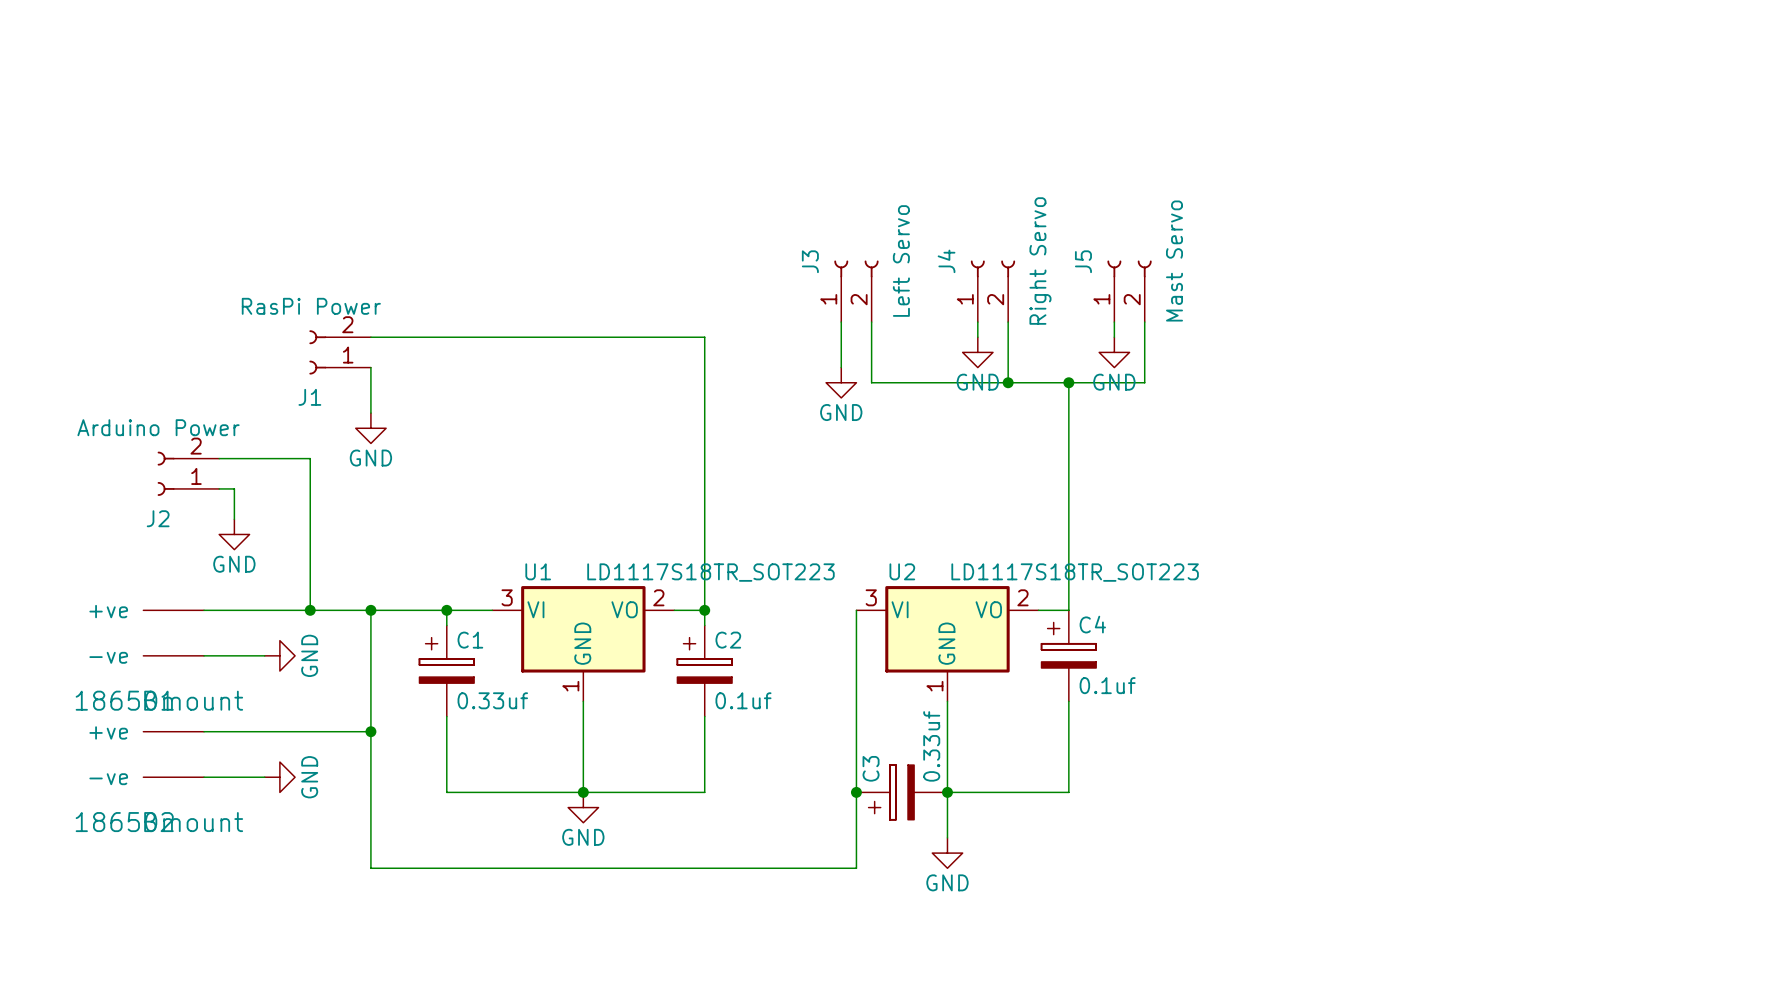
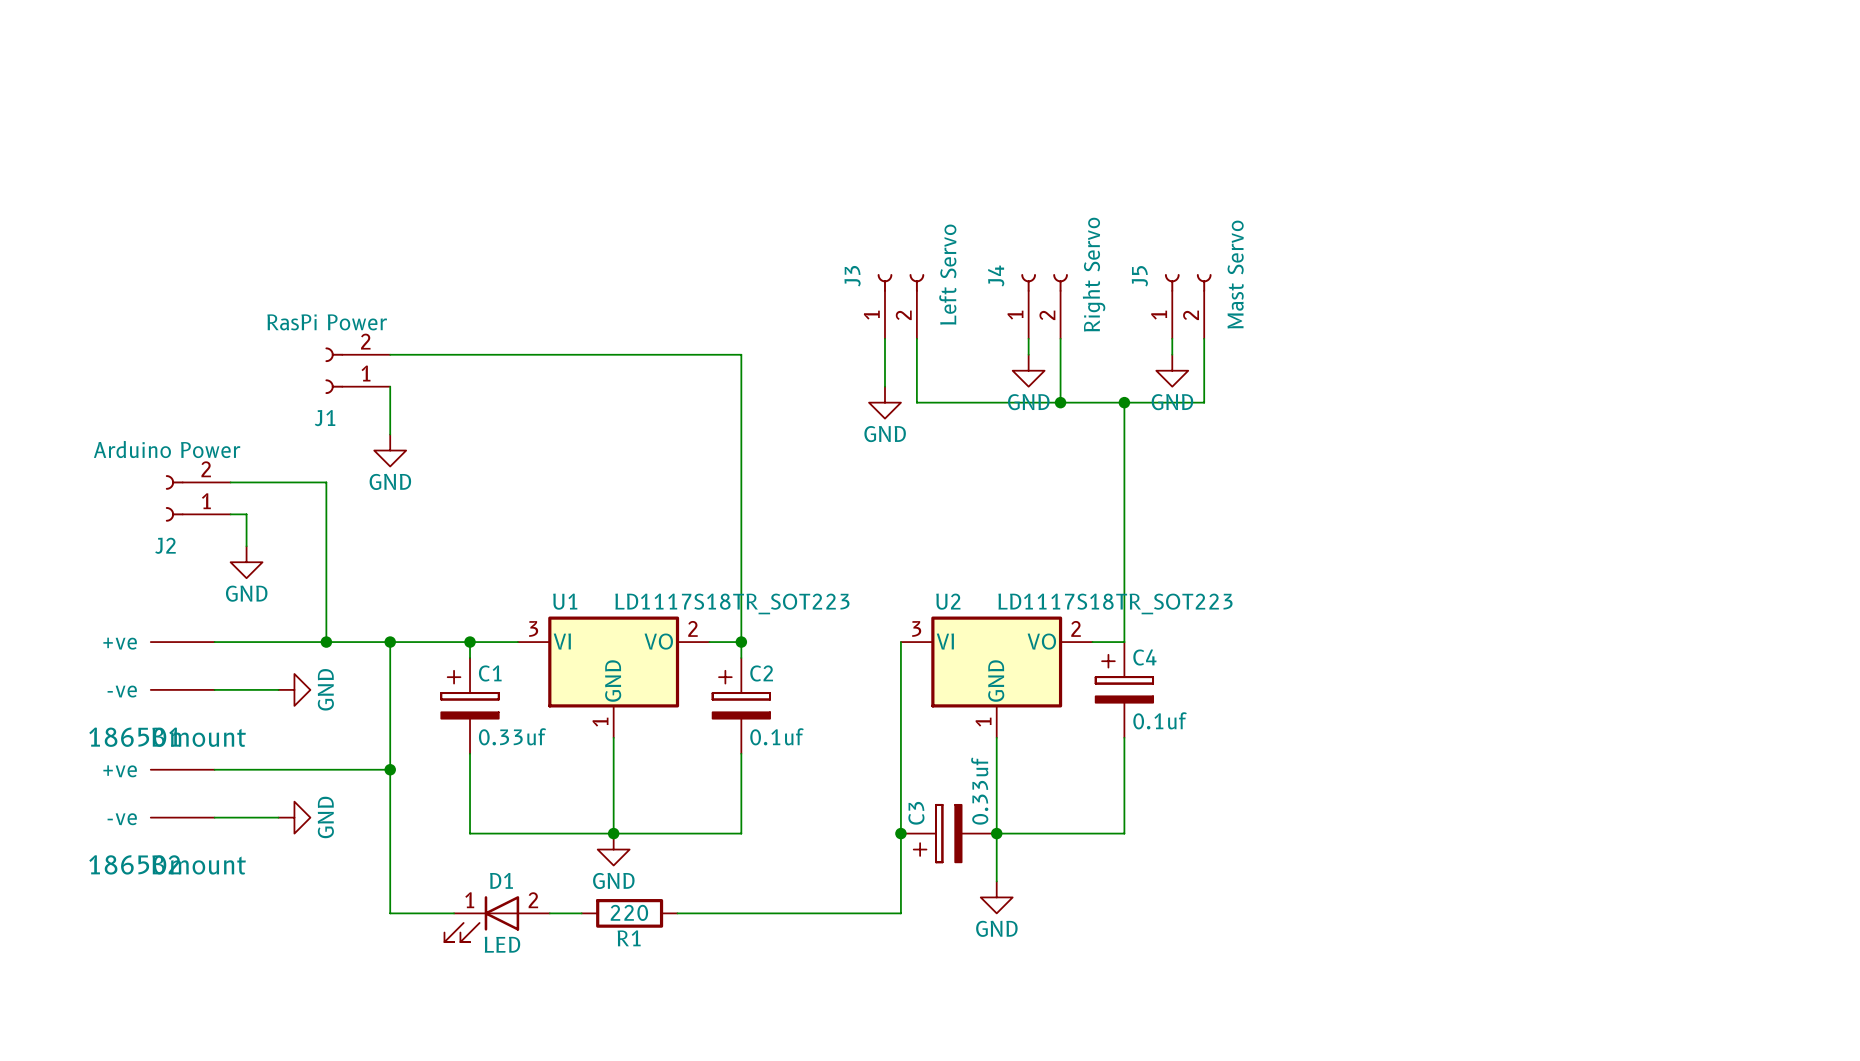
wire: (553, 868) (644, 868) -> none
R1: none -> 220 (629, 913)
D1: none -> LED (497, 919)

